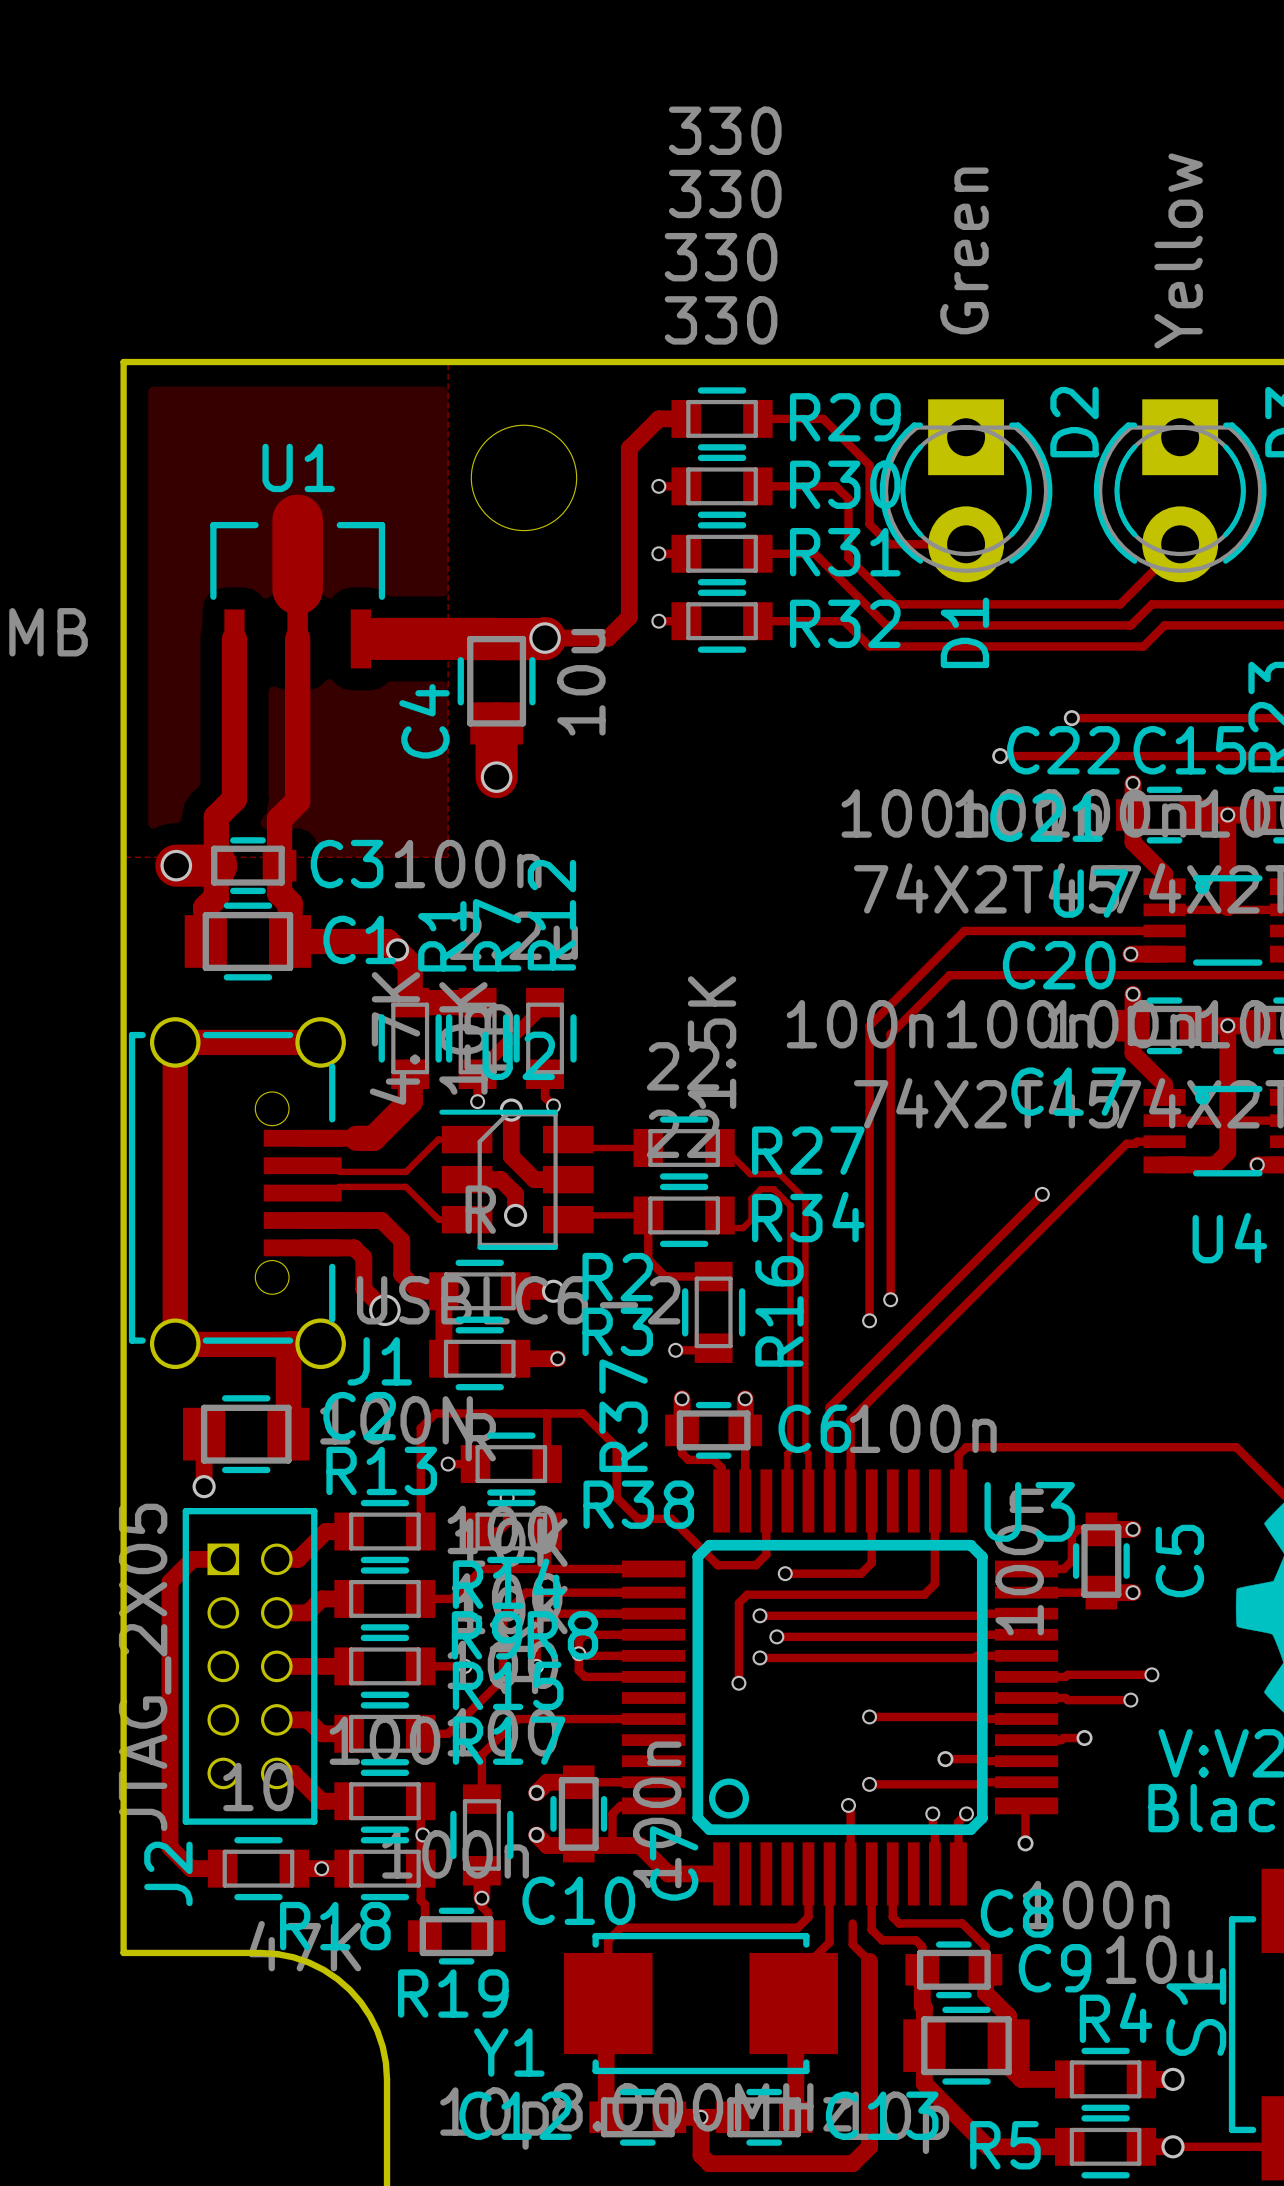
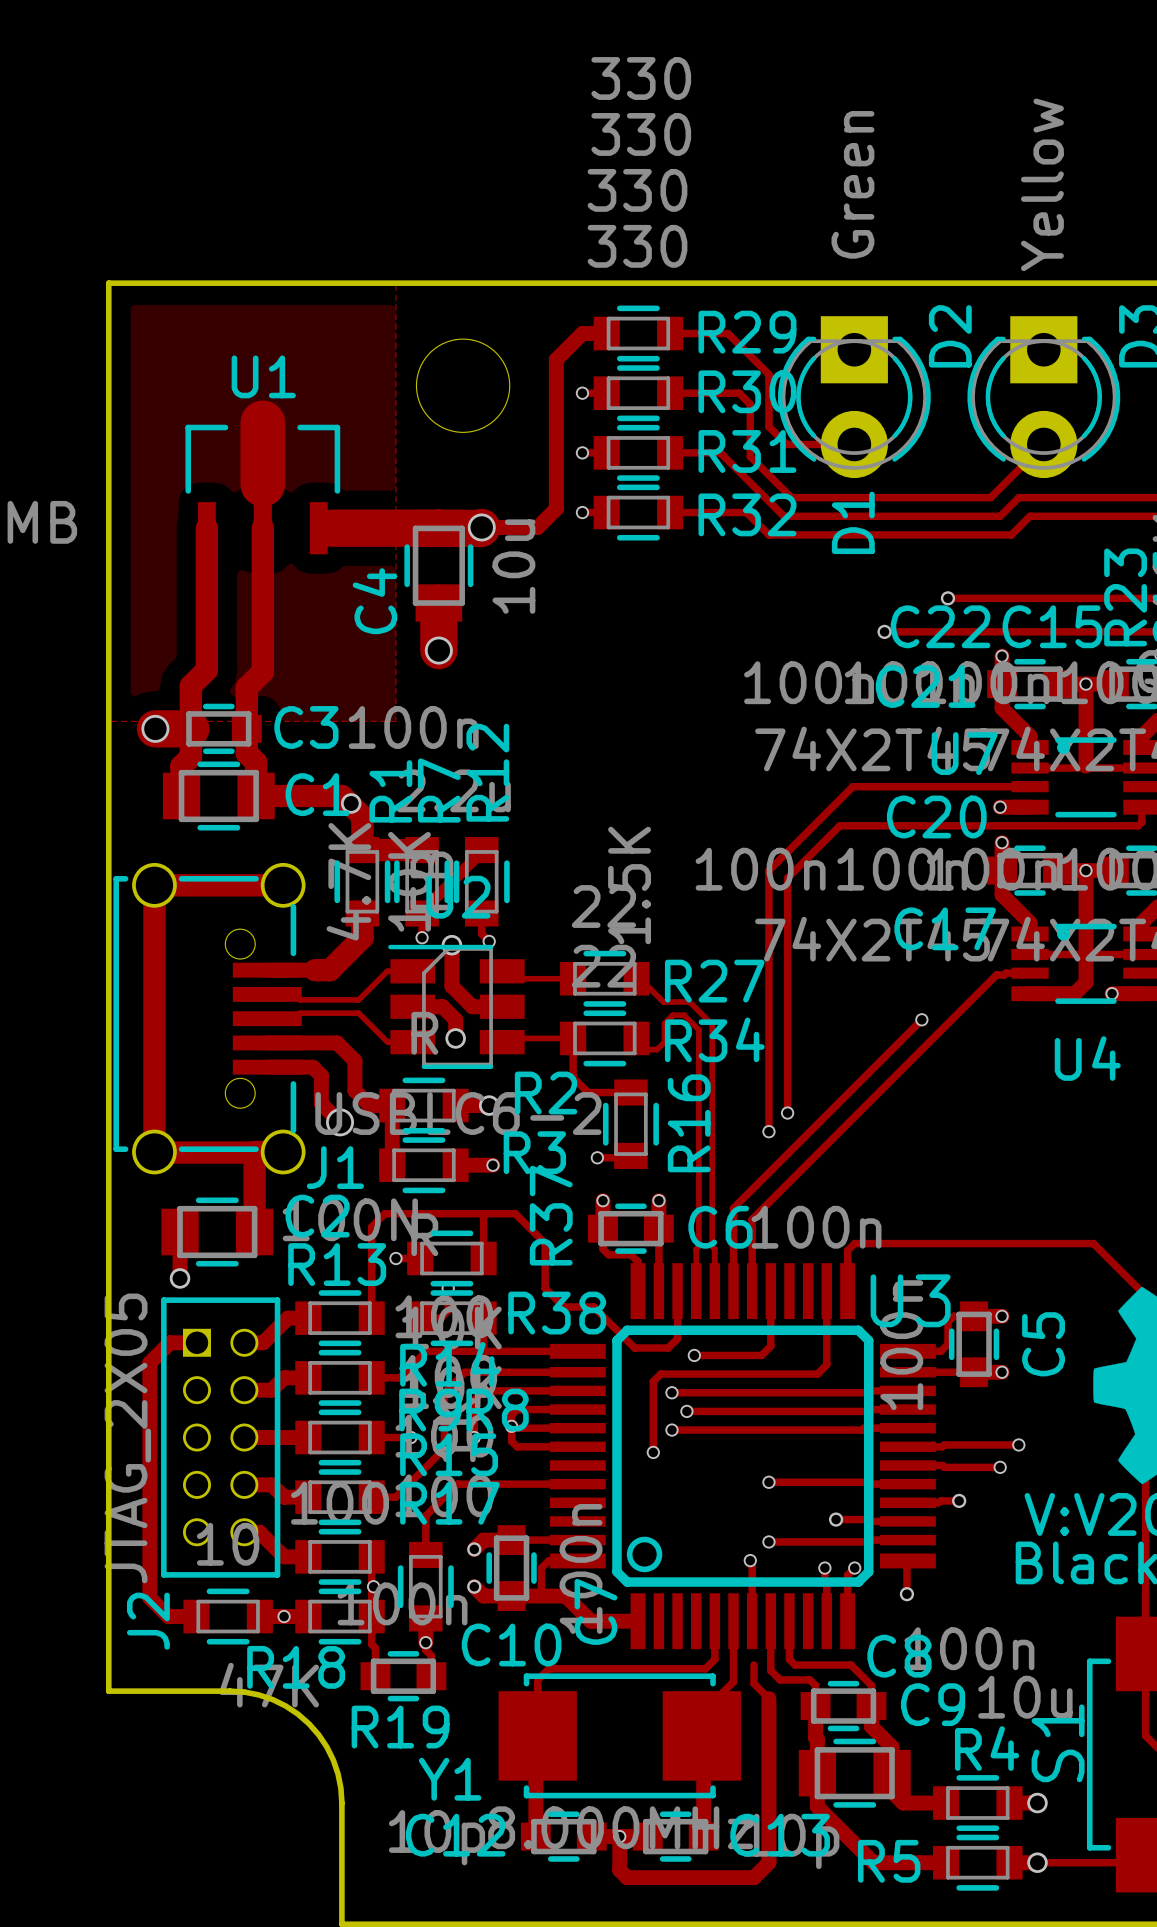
R3 name position: R3 (617, 1331) -> R3 (534, 1152)
R38 name position: R38 (638, 1504) -> R38 (557, 1313)

